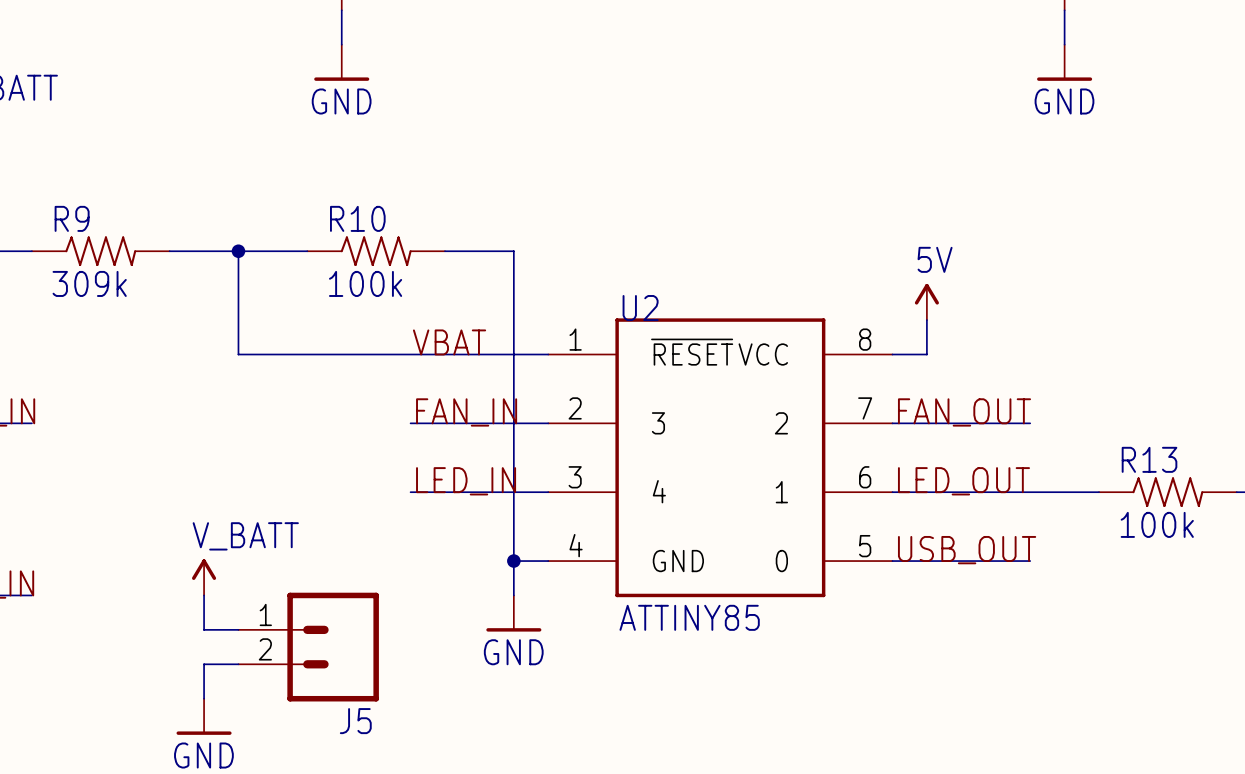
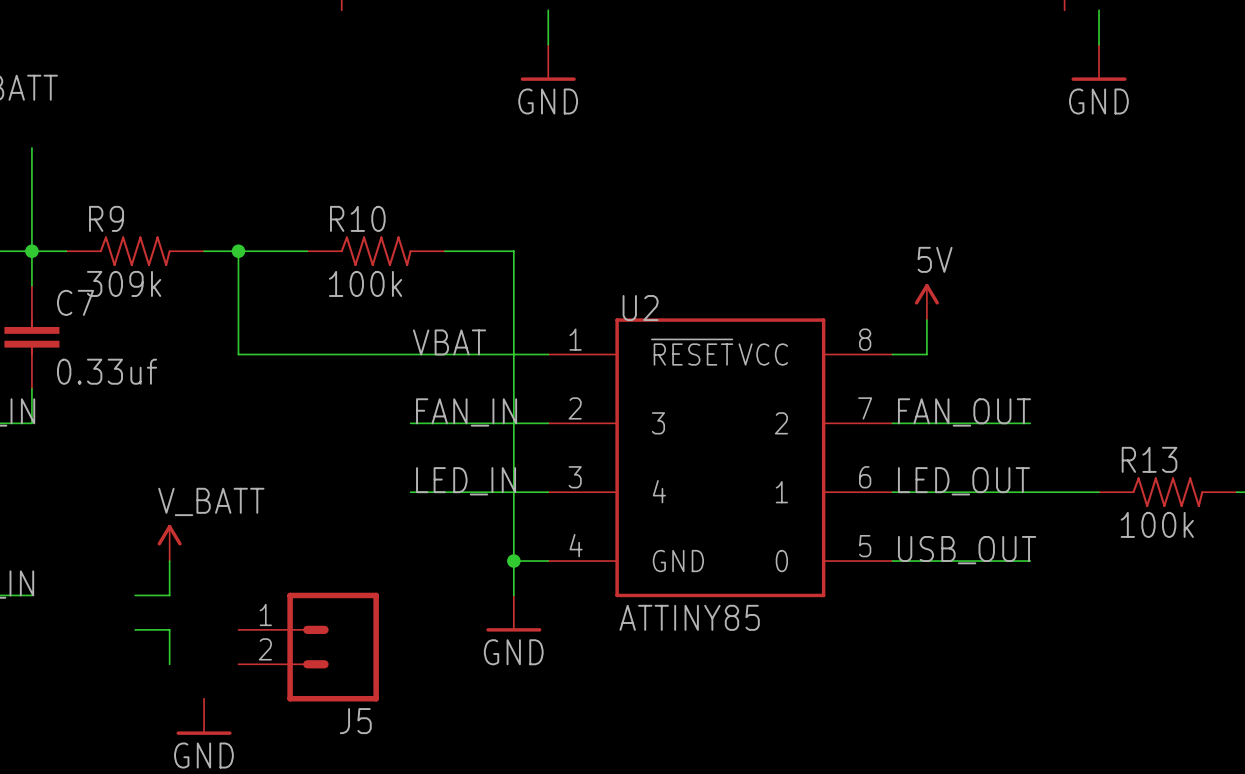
wire: (341, 10) (341, 44) -> (548, 10) (548, 44)
wire: (1064, 10) (1064, 44) -> (1099, 10) (1099, 44)
power symbol position: GND (341, 62) -> GND (548, 62)
power symbol position: GND (1064, 62) -> GND (1099, 62)
wire: none -> (31, 147) (31, 285)
junction: none -> (31, 251)
R9 position: (100, 251) -> (135, 251)
C7: none -> 0.33uf (31, 337)
wire: none -> (31, 388) (31, 423)
wire: none -> (169, 561) (169, 595) (135, 595)
power symbol position: V_BATT (204, 577) -> V_BATT (169, 542)
wire: (204, 595) (204, 629) (238, 629) -> none
wire: none -> (135, 629) (169, 629) (169, 664)
wire: (238, 664) (204, 664) (204, 698) -> none

